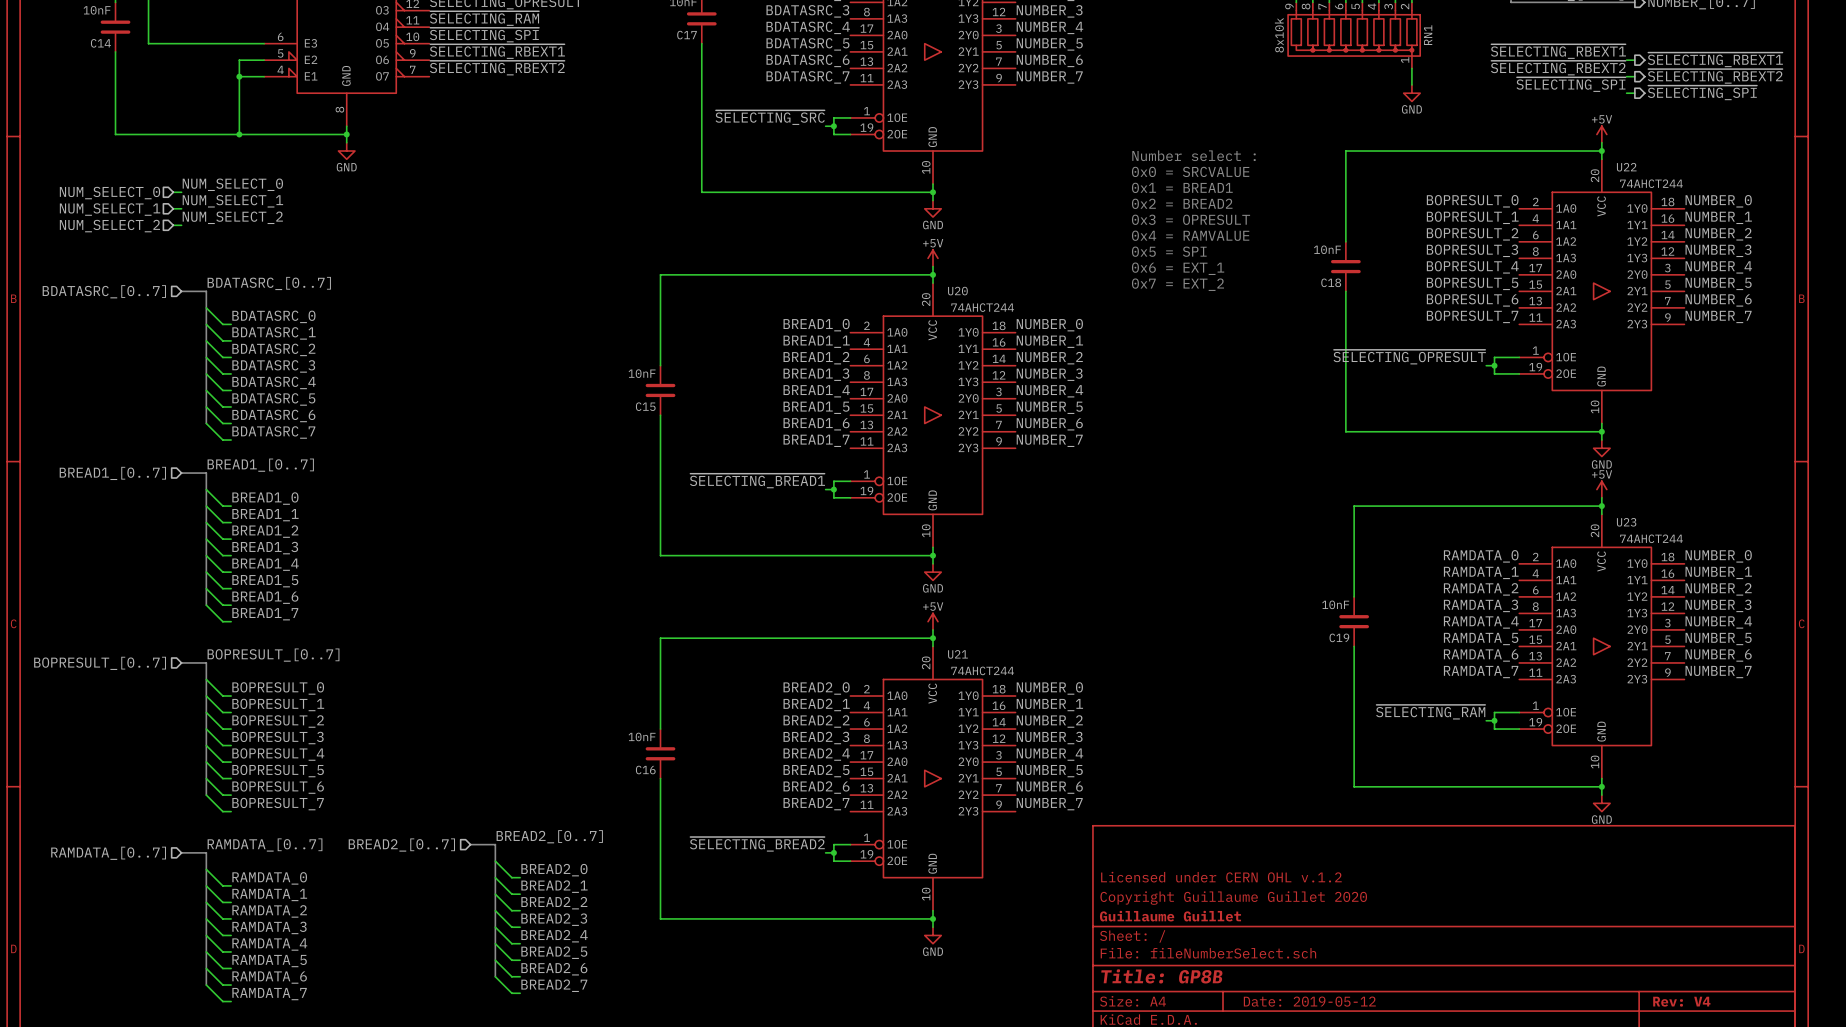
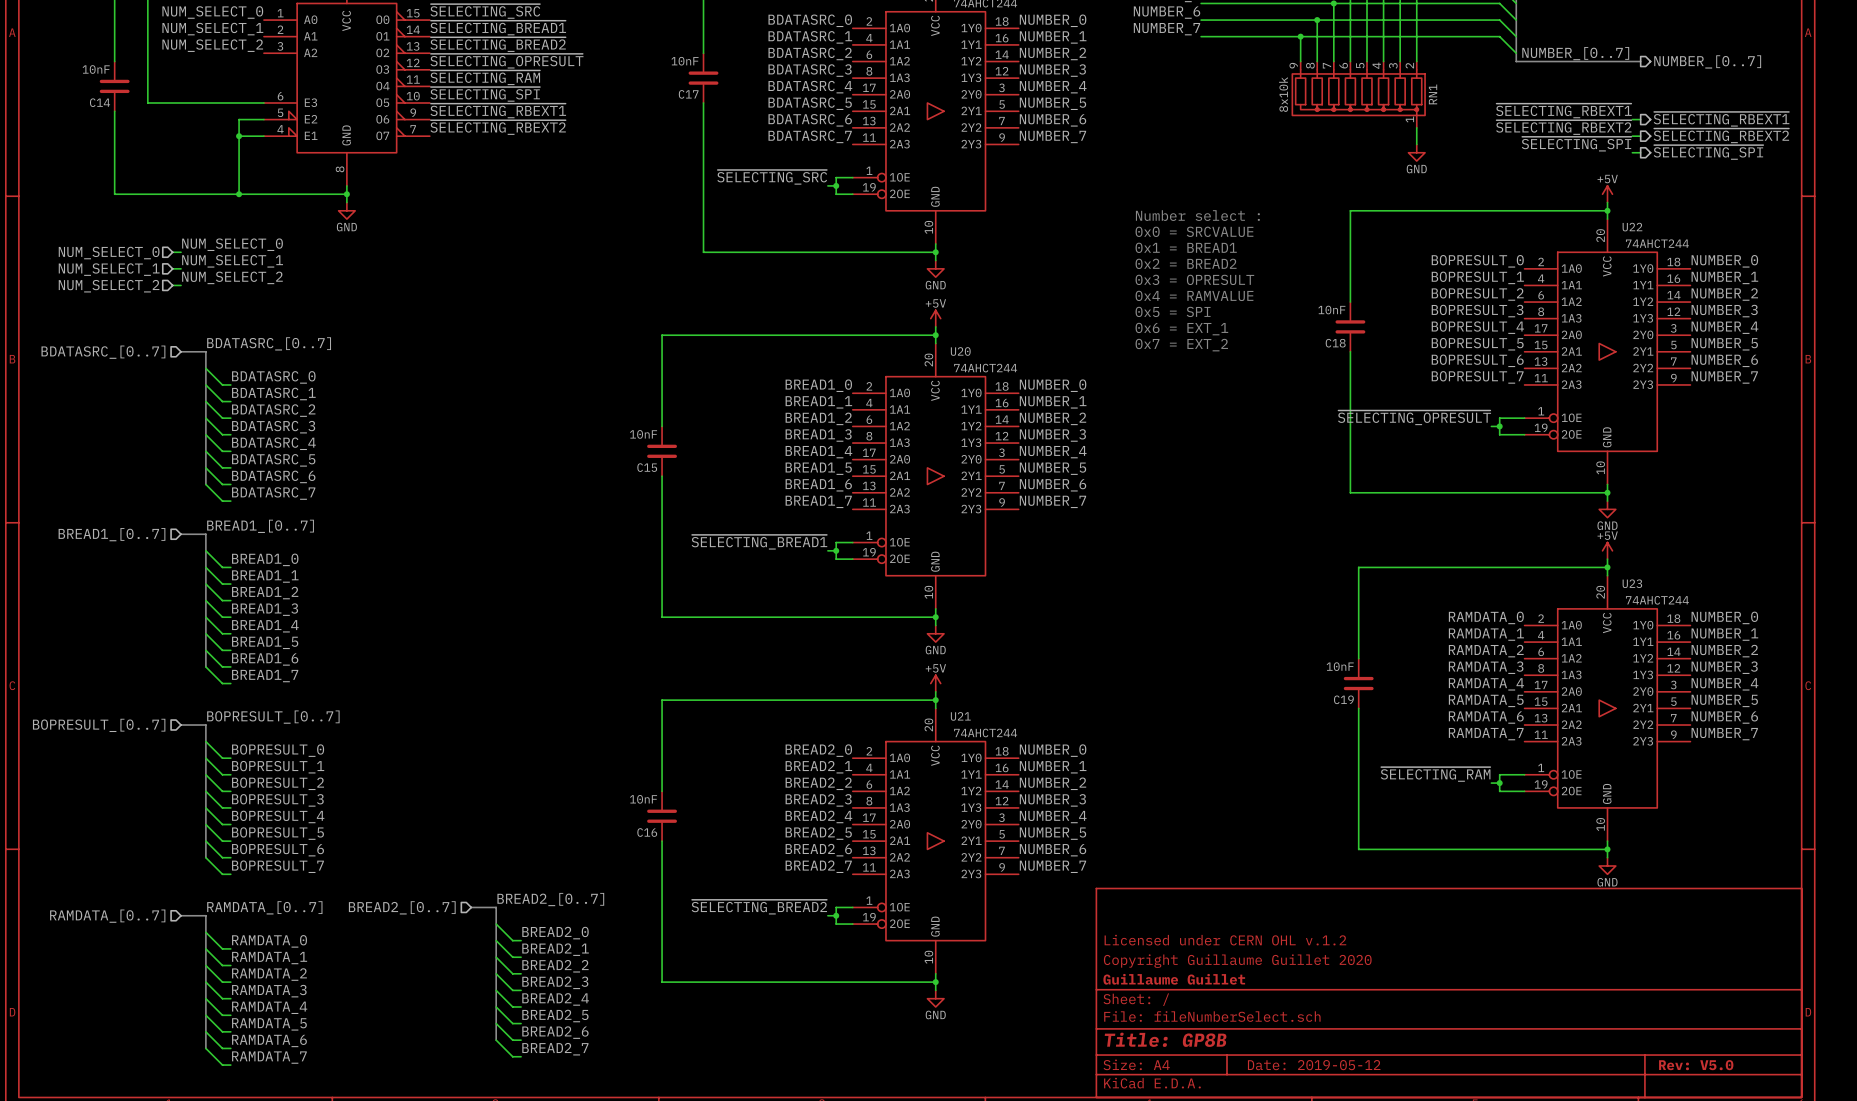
title block: Rev: V4 (1681, 1001) -> Rev: V5.0 (1696, 1065)

